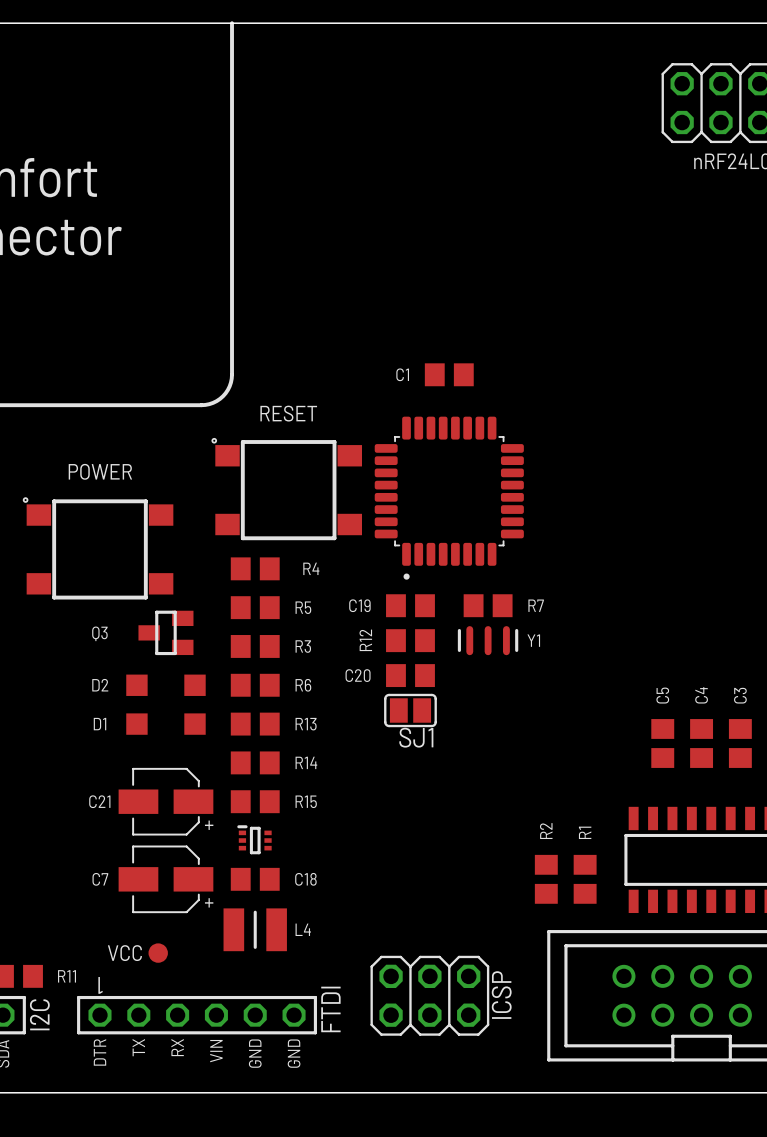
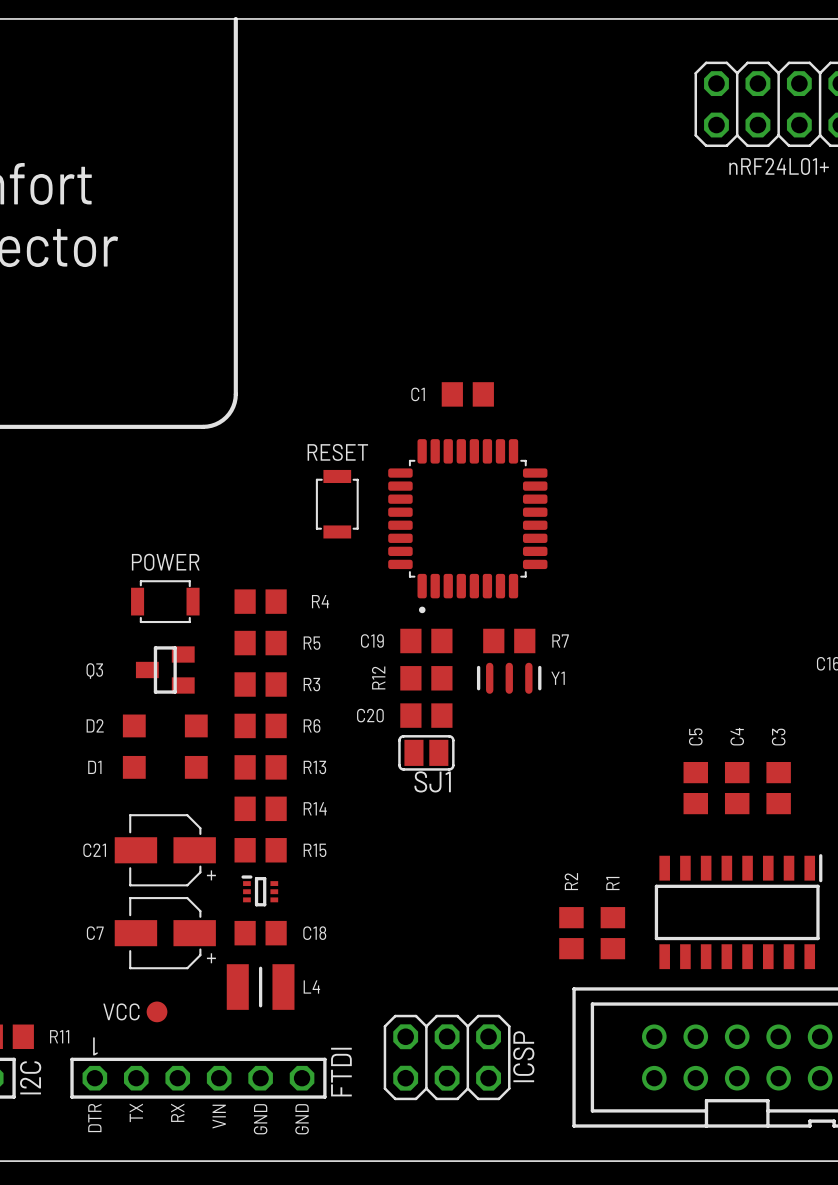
RESET: none -> (337, 504)
RESET: (286, 489) -> none
POWER: (98, 548) -> none
POWER: none -> (165, 601)

